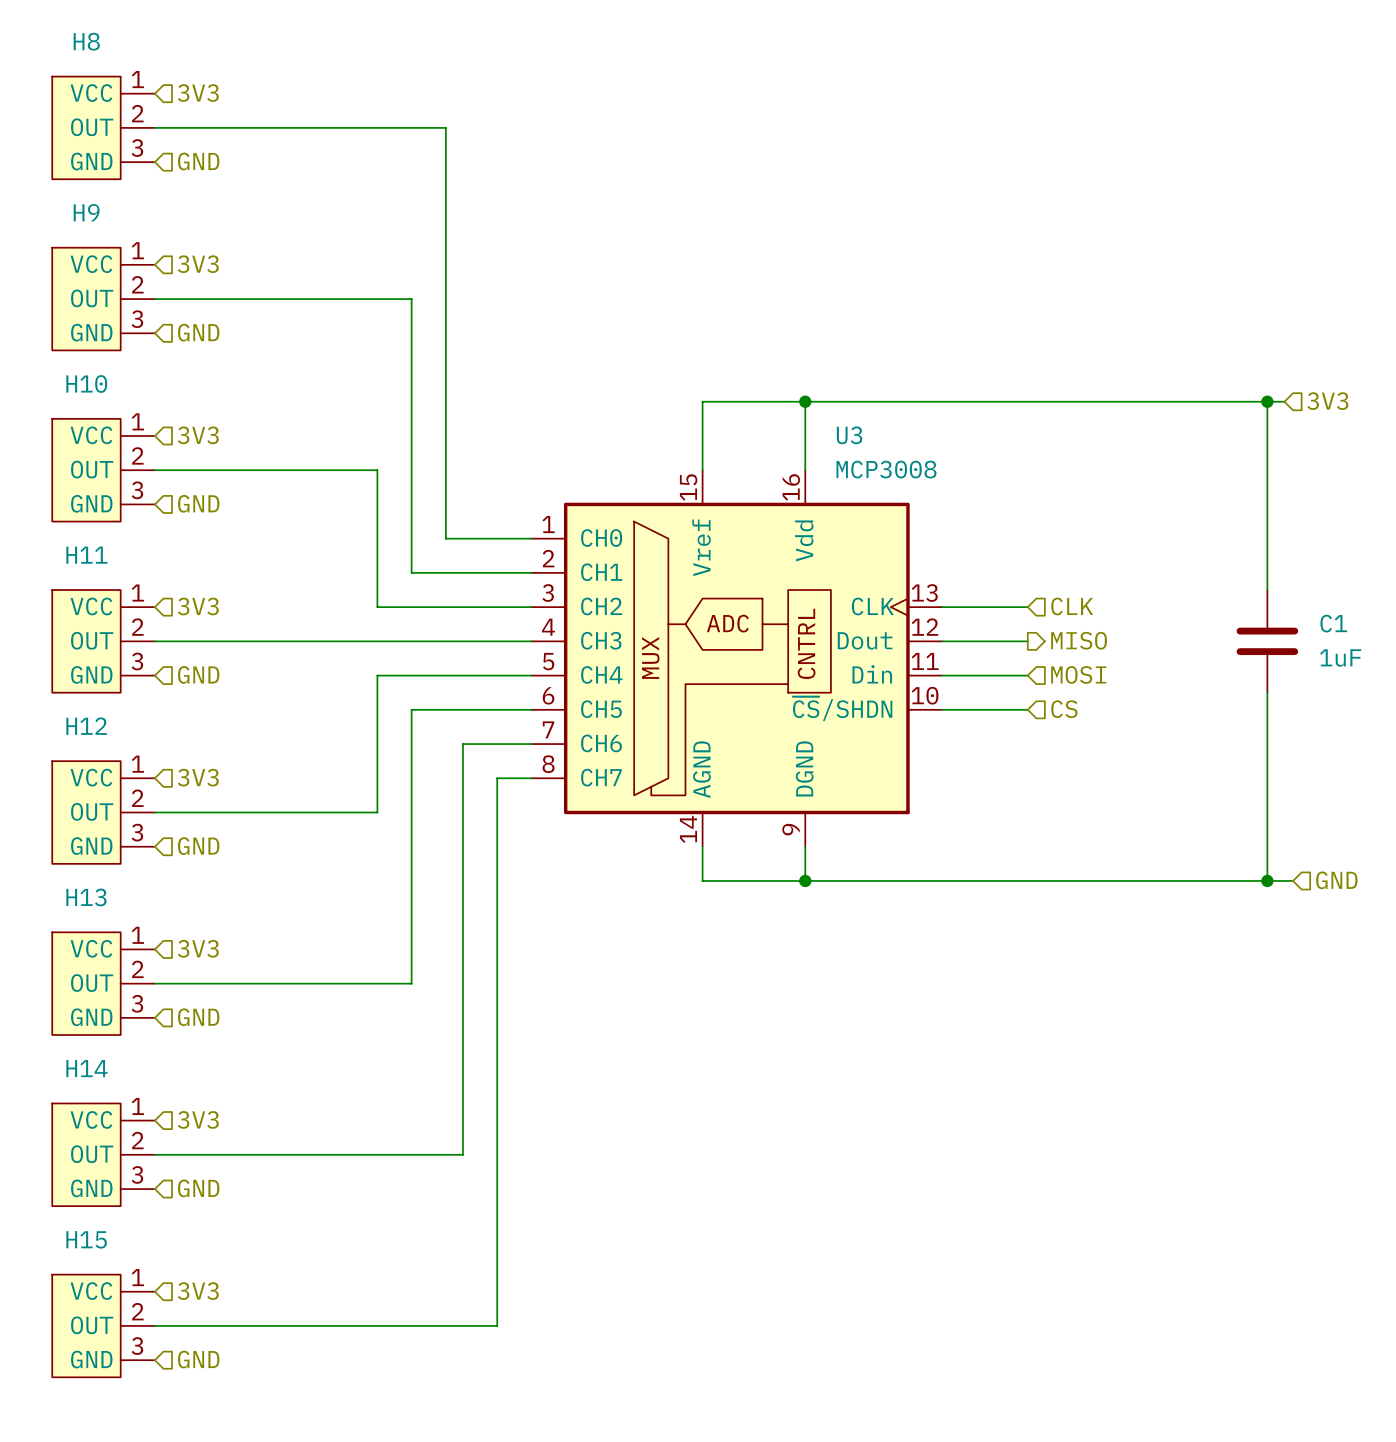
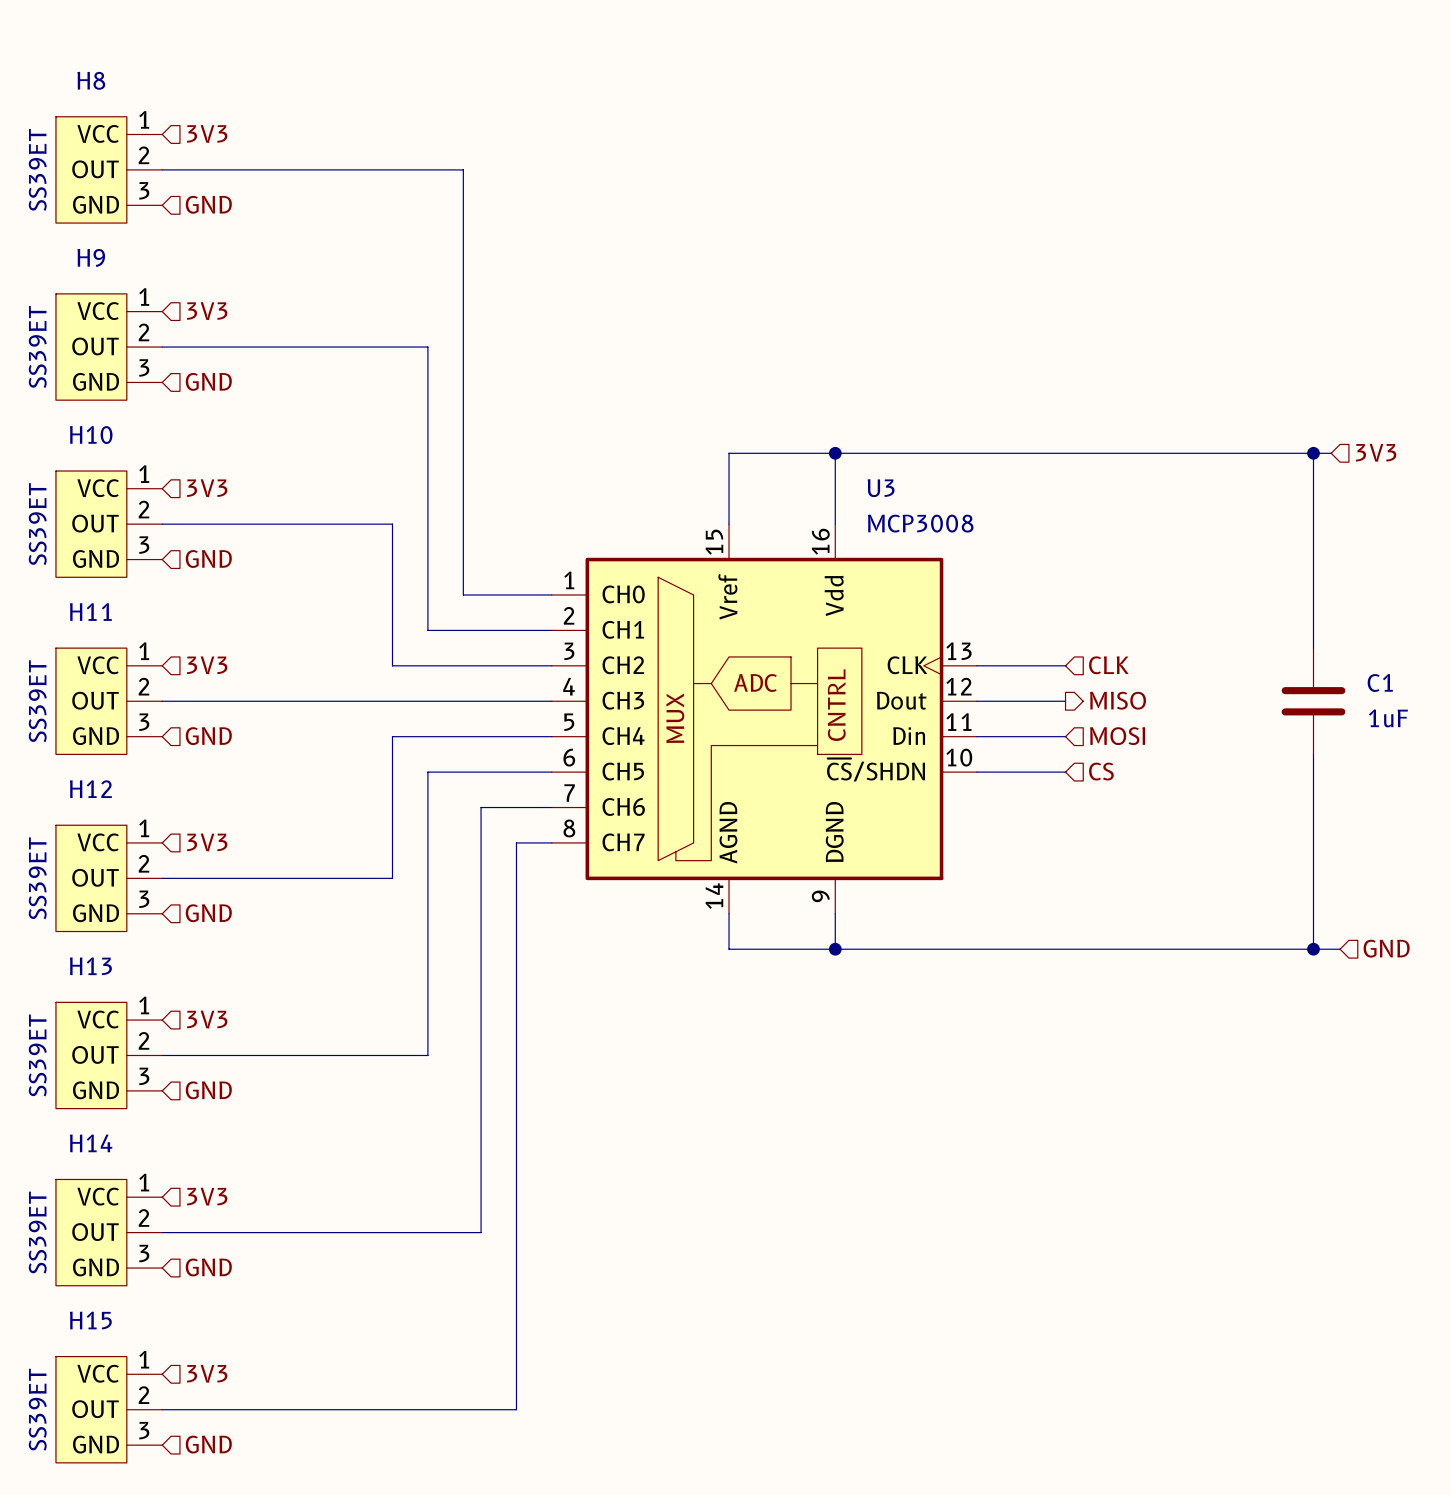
H8 value: none -> SS39ET (37, 169)
H9 value: none -> SS39ET (37, 347)
H10 value: none -> SS39ET (37, 524)
H11 value: none -> SS39ET (37, 701)
H12 value: none -> SS39ET (37, 878)
H13 value: none -> SS39ET (37, 1055)
H14 value: none -> SS39ET (37, 1232)
H15 value: none -> SS39ET (37, 1409)

